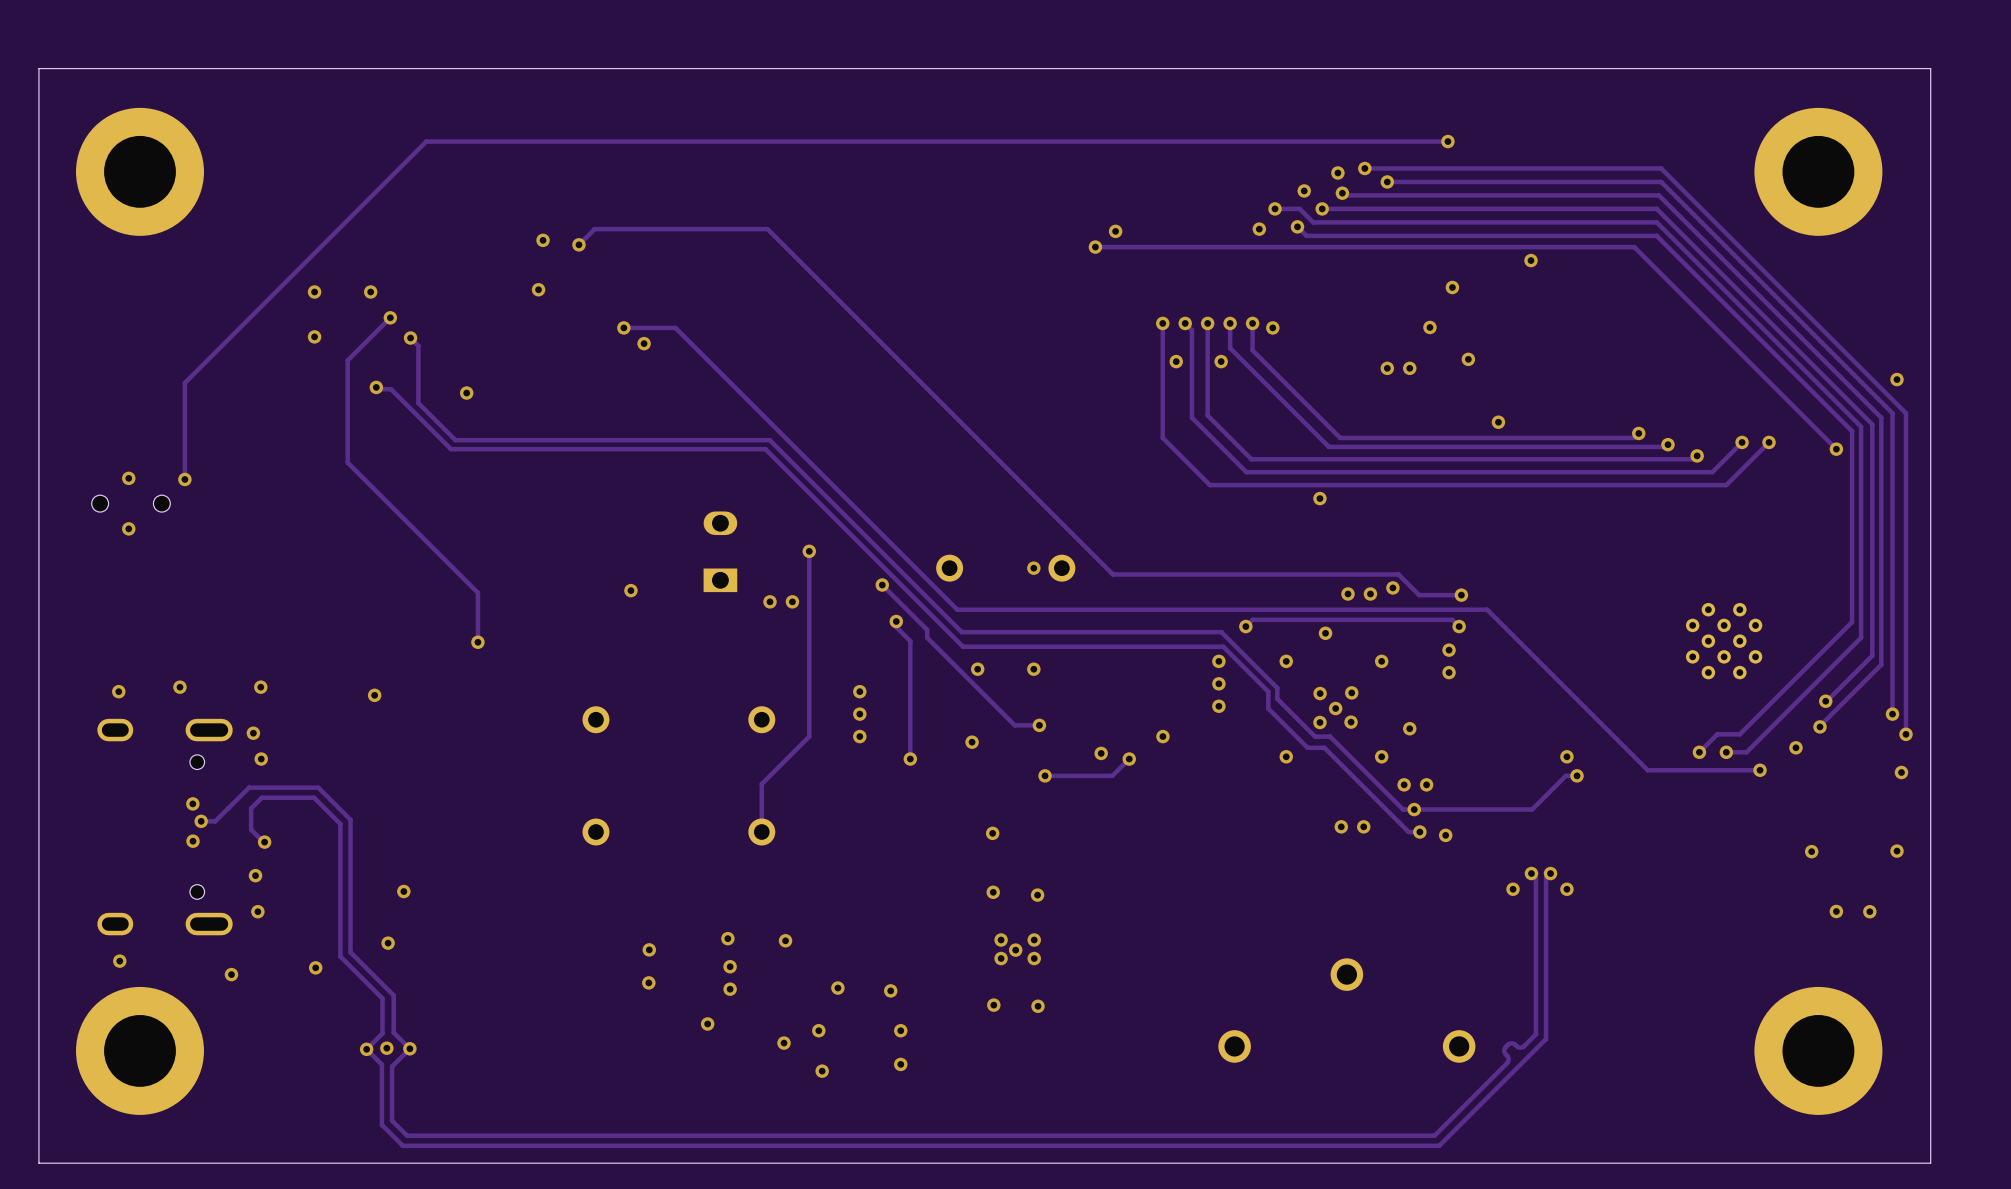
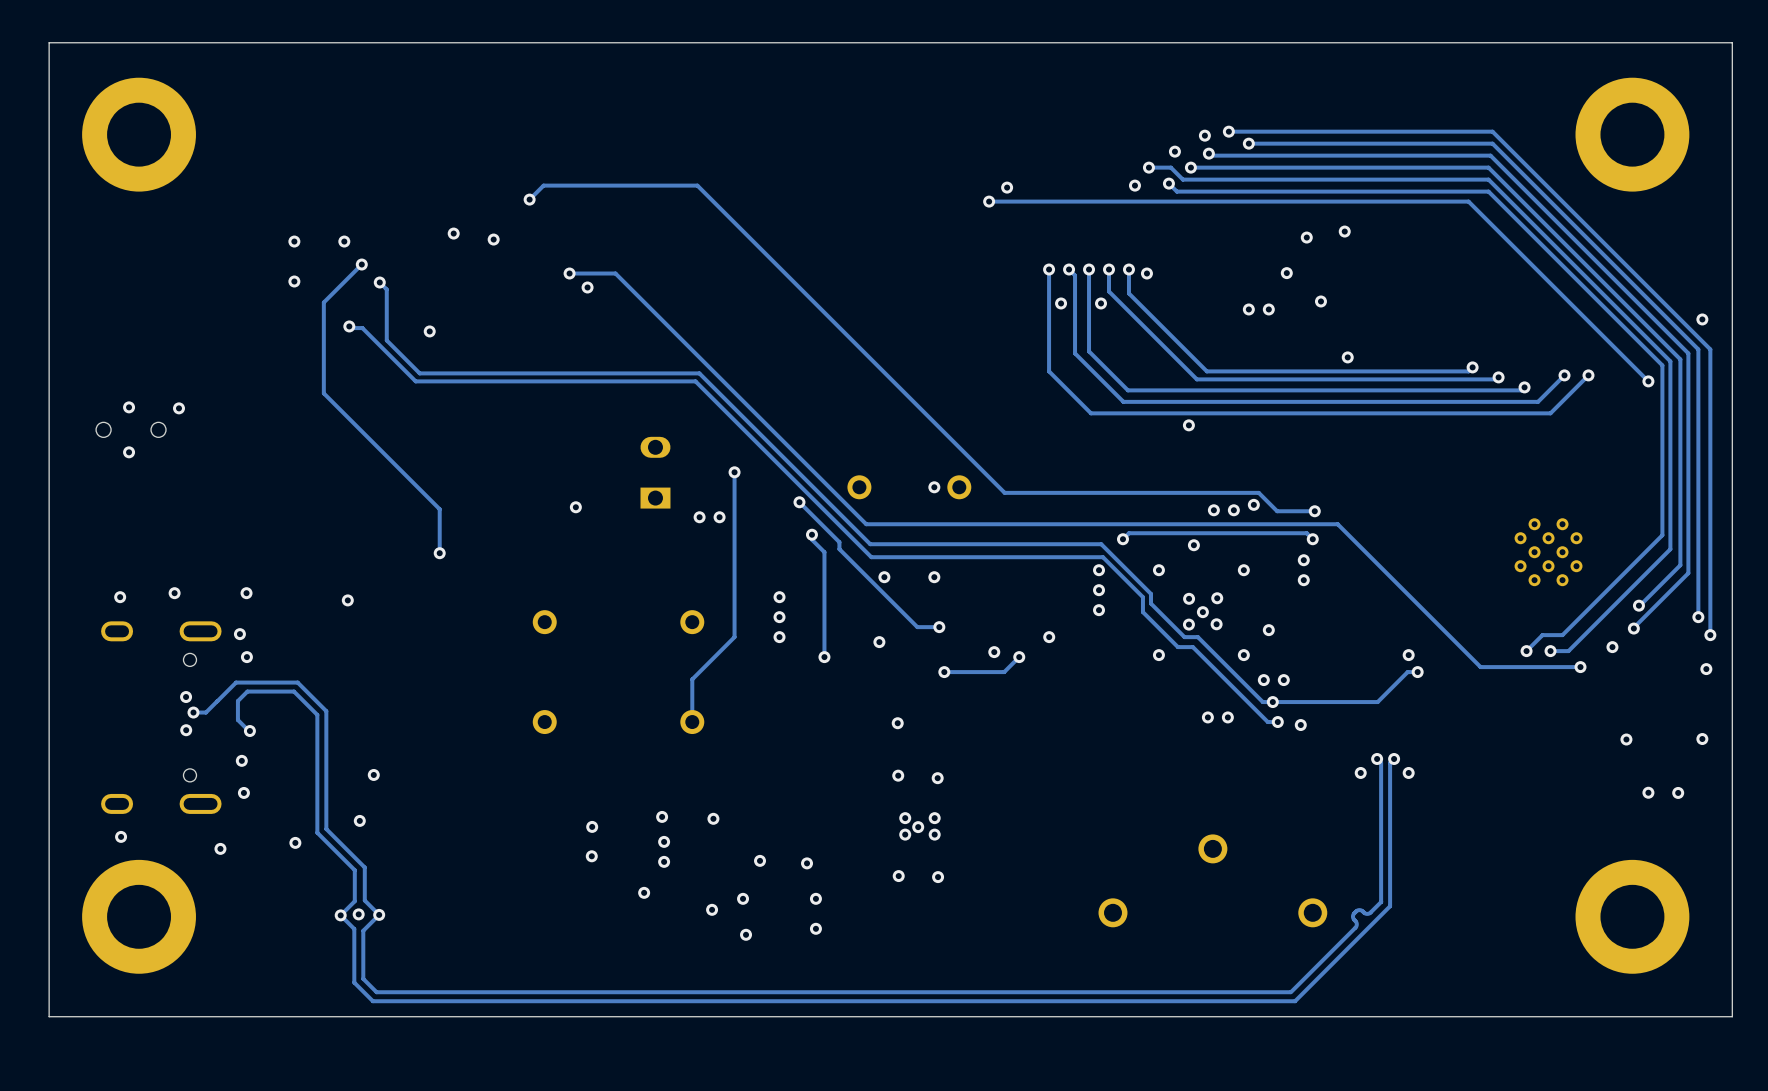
track: (1445, 141) (426, 141) (184, 382) (184, 479) -> none
via: (1447, 141) -> none
via position: (543, 240) -> (453, 233)
via position: (1531, 260) -> (1344, 231)

